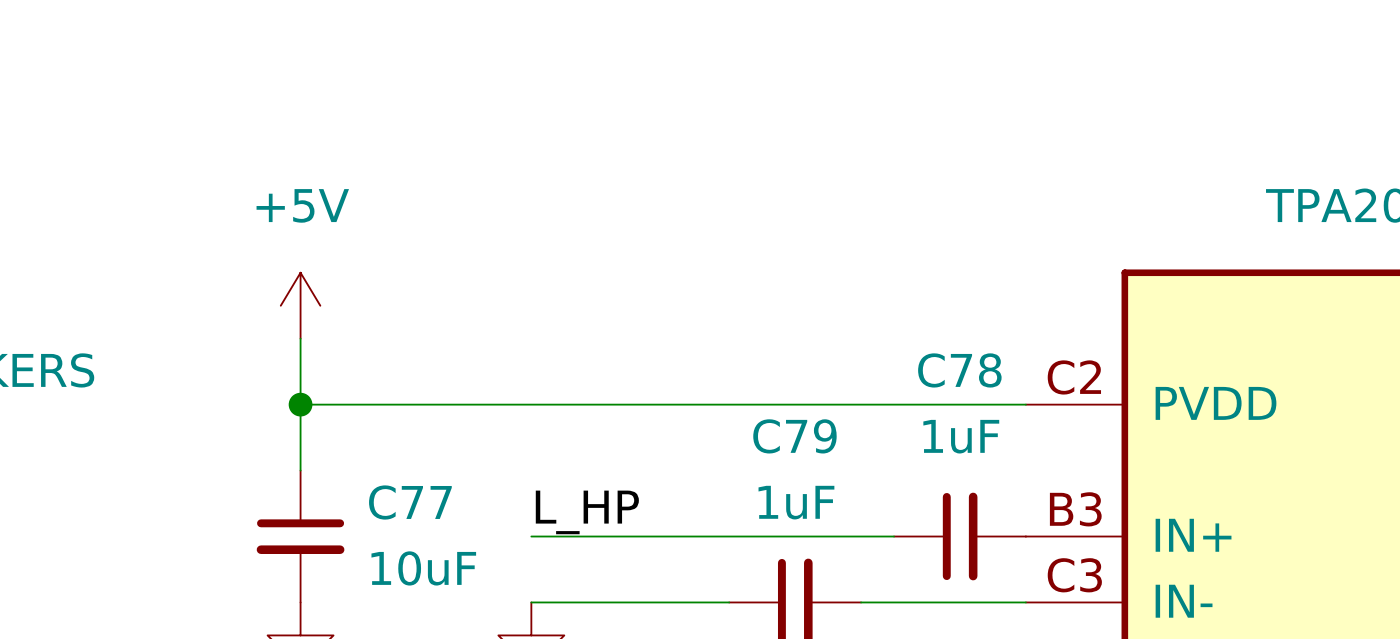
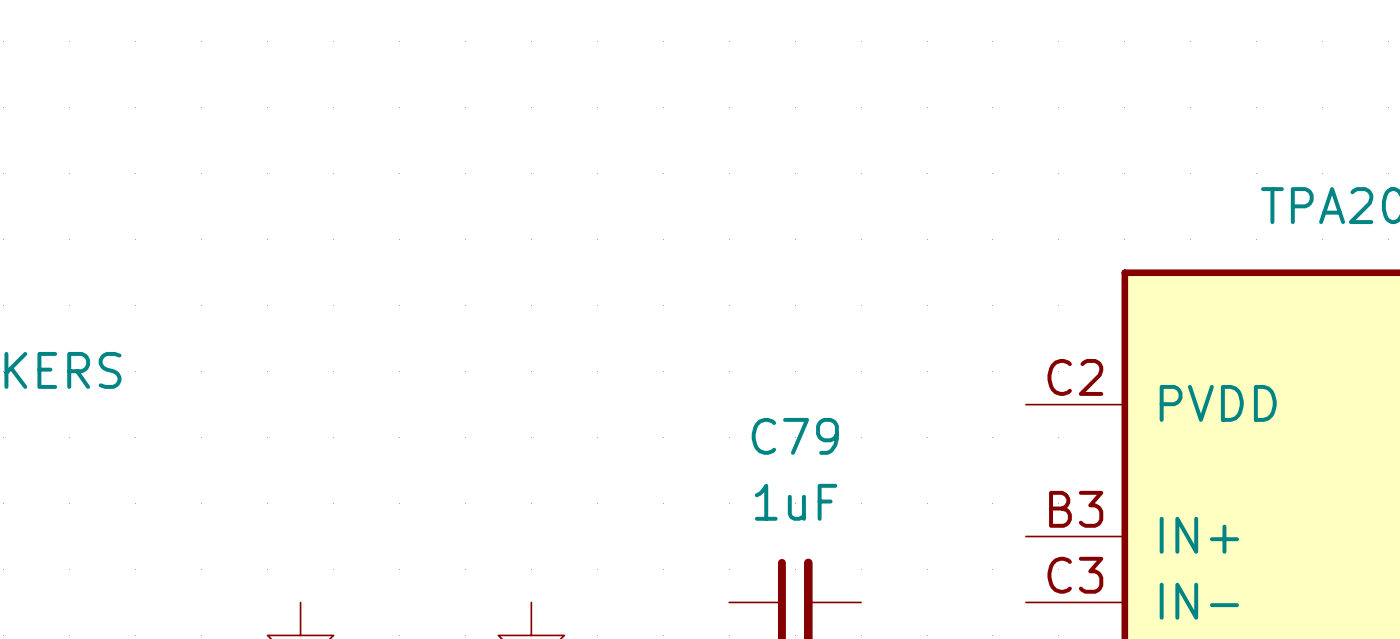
power symbol: +5V (300, 305) -> none
wire: (300, 338) (300, 470) -> none
wire: (300, 404) (1025, 404) -> none
junction: (300, 404) -> none
label: L_HP (587, 512) -> none
C77: 10uF (300, 536) -> none
wire: (531, 536) (894, 536) -> none
C78: 1uF (959, 536) -> none
wire: (531, 602) (729, 602) -> none
wire: (861, 602) (1025, 602) -> none

